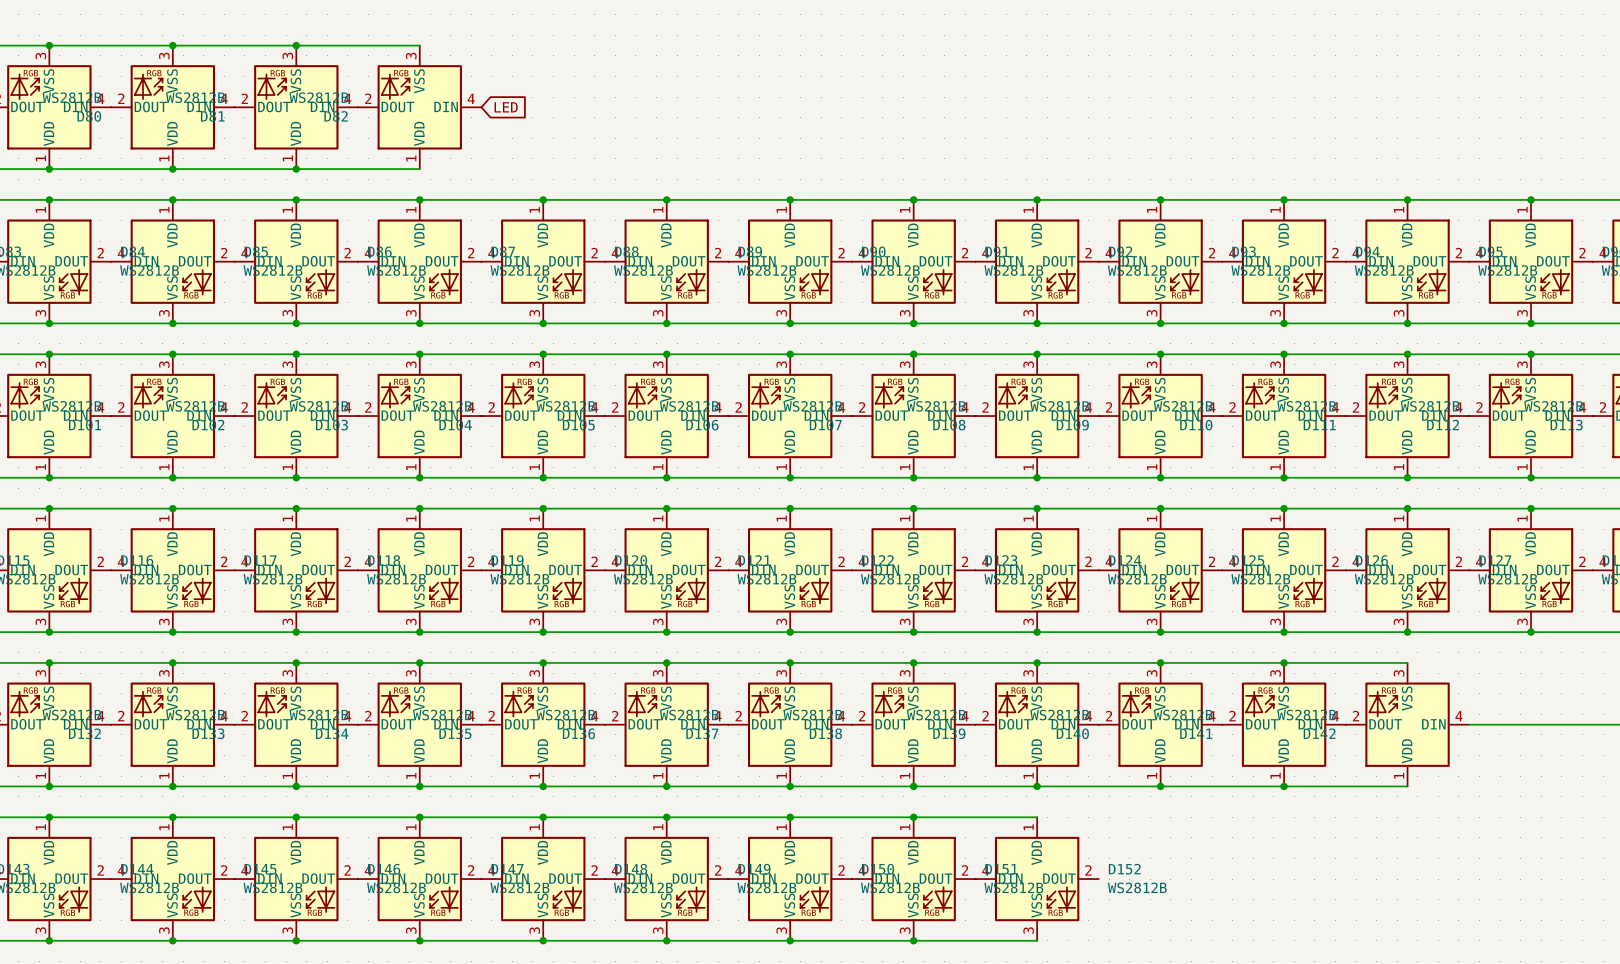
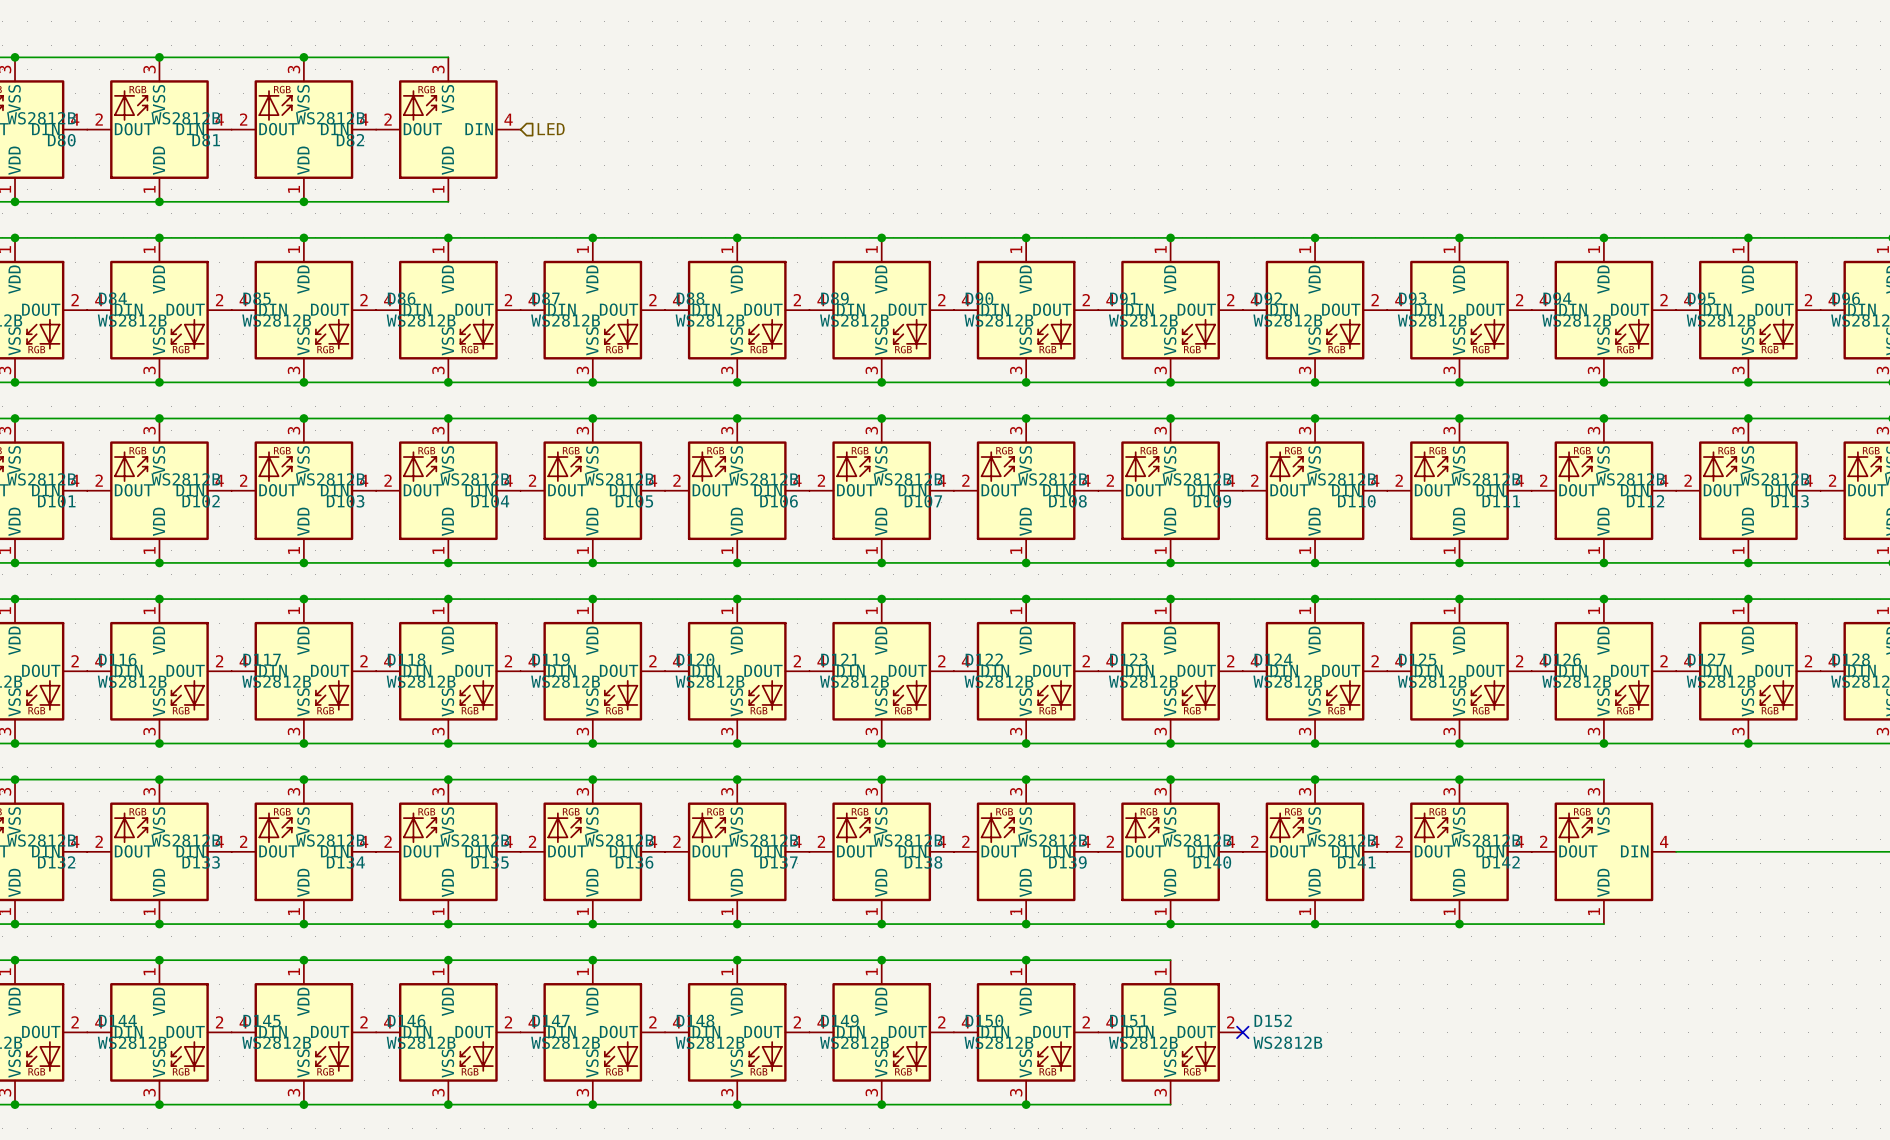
hierarchical label: none -> LED (551, 129)
global label: LED (506, 107) -> none
no-connect mark: none -> (1242, 1032)

